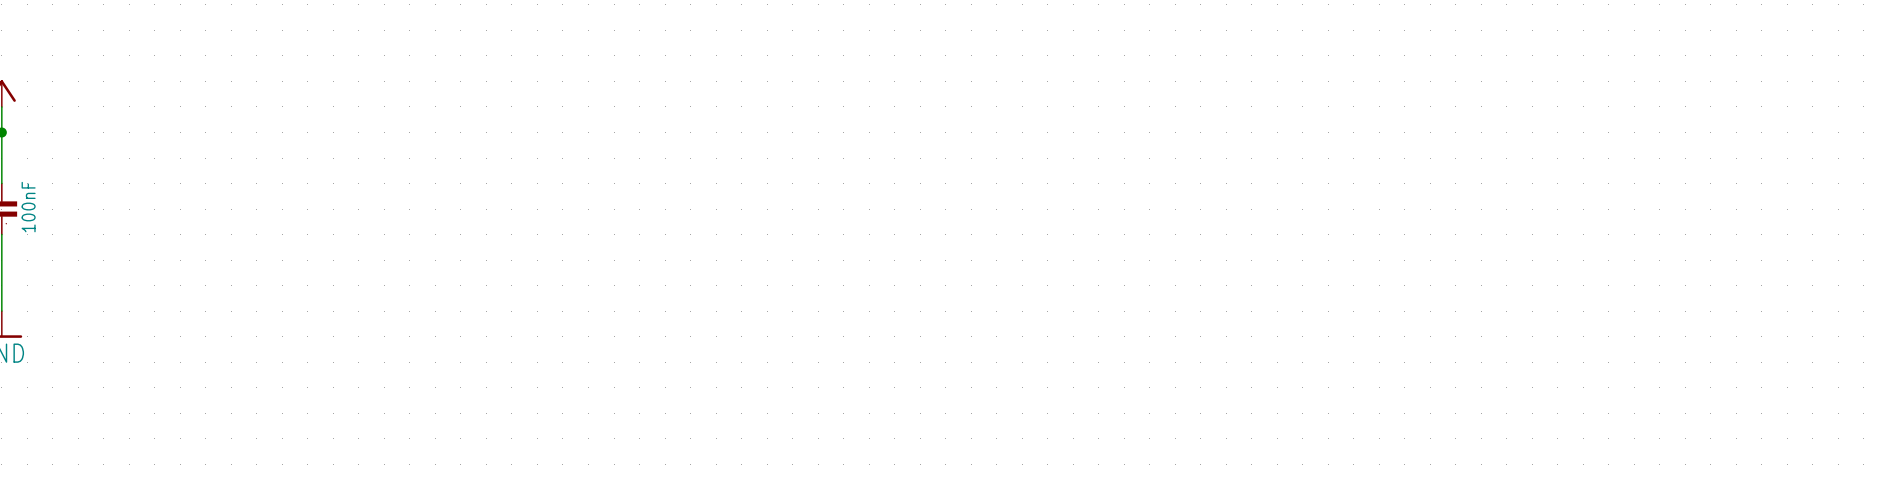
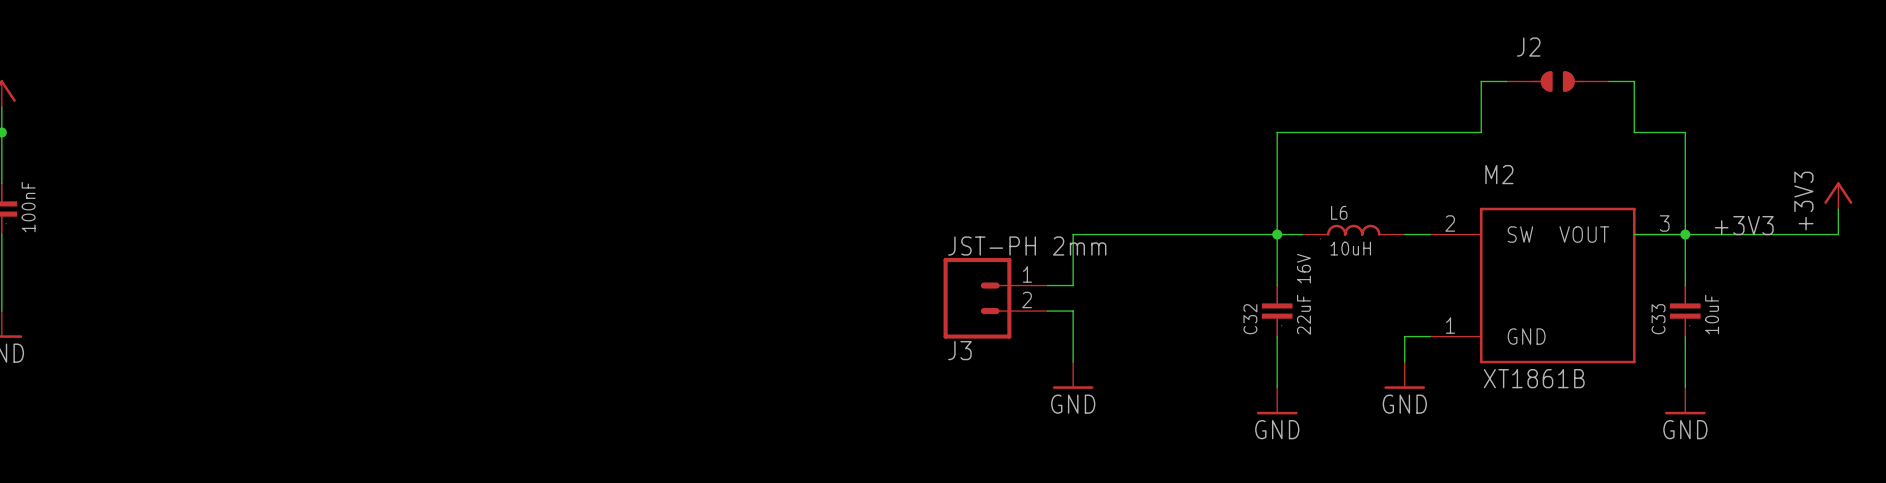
wire: none -> (1506, 81) (1481, 81) (1481, 132) (1277, 132) (1277, 285)
J2: none -> (1557, 81)
wire: none -> (1608, 81) (1634, 81) (1634, 132) (1685, 132) (1685, 285)
power symbol: none -> +3V3 (1838, 195)
wire: none -> (1838, 209) (1838, 234) (1634, 234)
label: none -> +3V3 (1744, 225)
L6: none -> 10uH (1353, 232)
junction: none -> (1277, 234)
wire: none -> (1302, 234) (1073, 234) (1073, 285) (1047, 285)
wire: none -> (1404, 234) (1430, 234)
junction: none -> (1685, 234)
M2: none -> XT1861B (1557, 285)
J3: none -> JST-PH 2mm (995, 298)
wire: none -> (1047, 311) (1073, 311) (1073, 362)
C32: none -> 22uF 16V (1277, 311)
C33: none -> 10uF (1685, 311)
wire: none -> (1277, 336) (1277, 387)
wire: none -> (1430, 336) (1404, 336) (1404, 362)
wire: none -> (1685, 336) (1685, 387)
power symbol: none -> GND (1073, 375)
power symbol: none -> GND (1404, 375)
power symbol: none -> GND (1277, 400)
power symbol: none -> GND (1685, 400)

